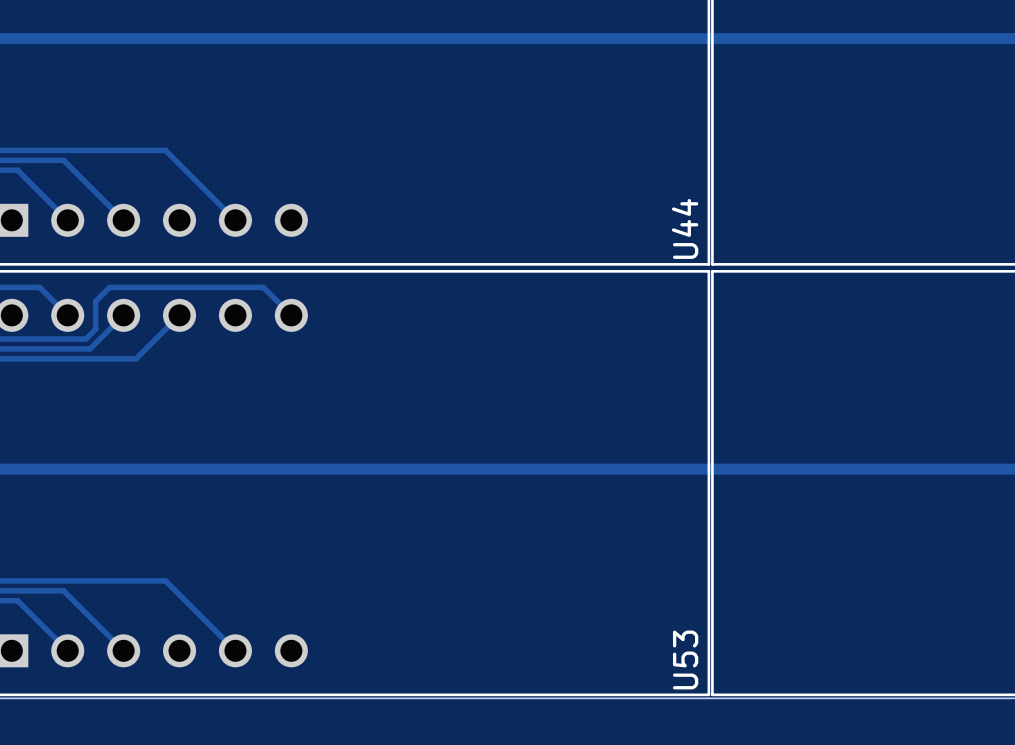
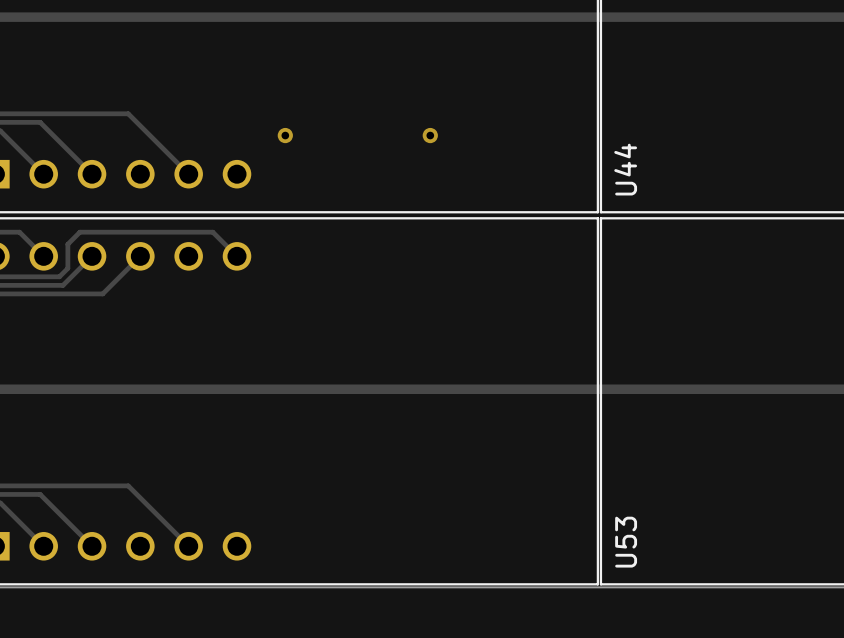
via: none -> (285, 135)
via: none -> (430, 135)
U44 name position: U44 (685, 228) -> U44 (625, 169)
U53 name position: U53 (685, 659) -> U53 (626, 542)

